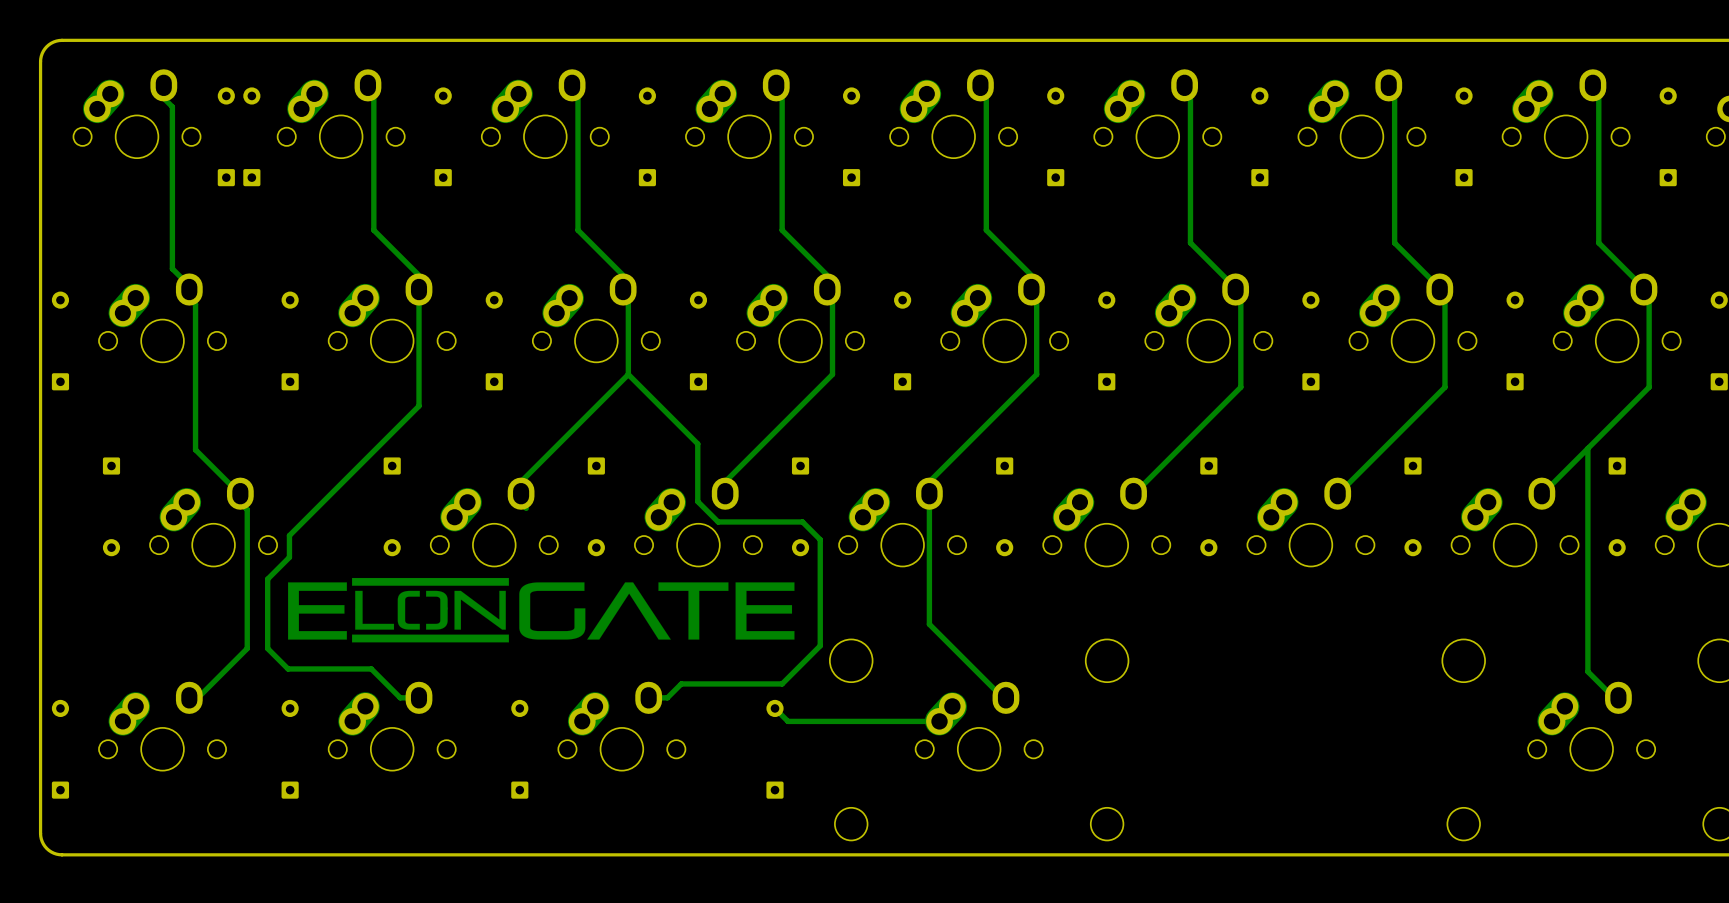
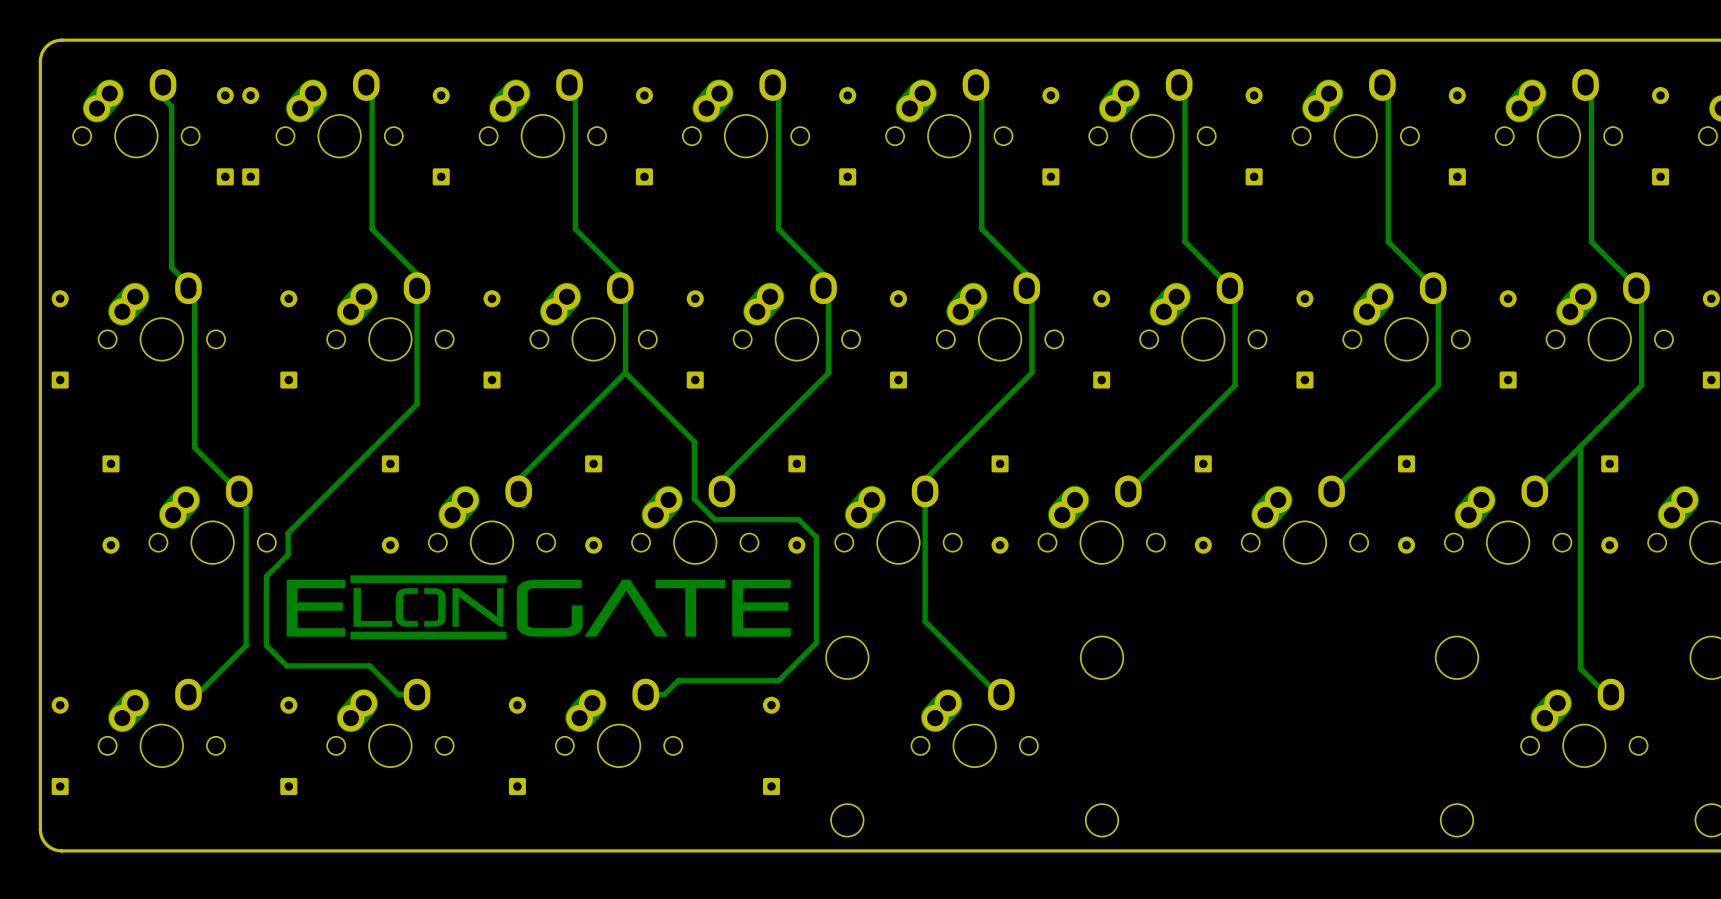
track: (775, 708) (787, 721) (939, 721) -> none

